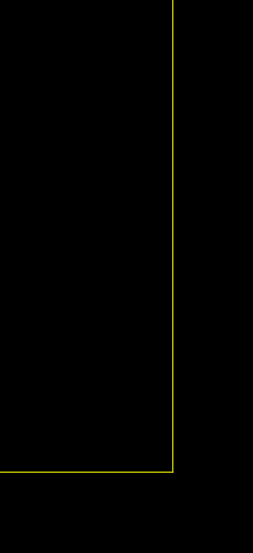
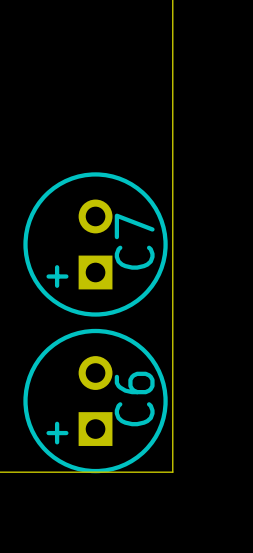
C7: none -> (95, 244)
C6: none -> (95, 401)

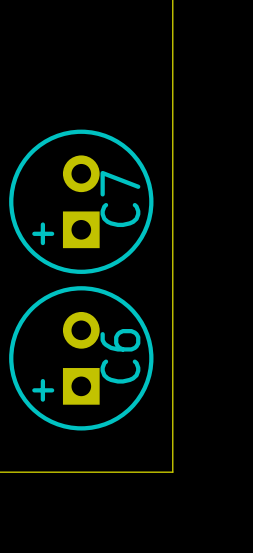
C7 footprint: [23, 172, 168, 317] -> [9, 129, 154, 274]
C6 footprint: [23, 328, 168, 474] -> [9, 286, 154, 431]

